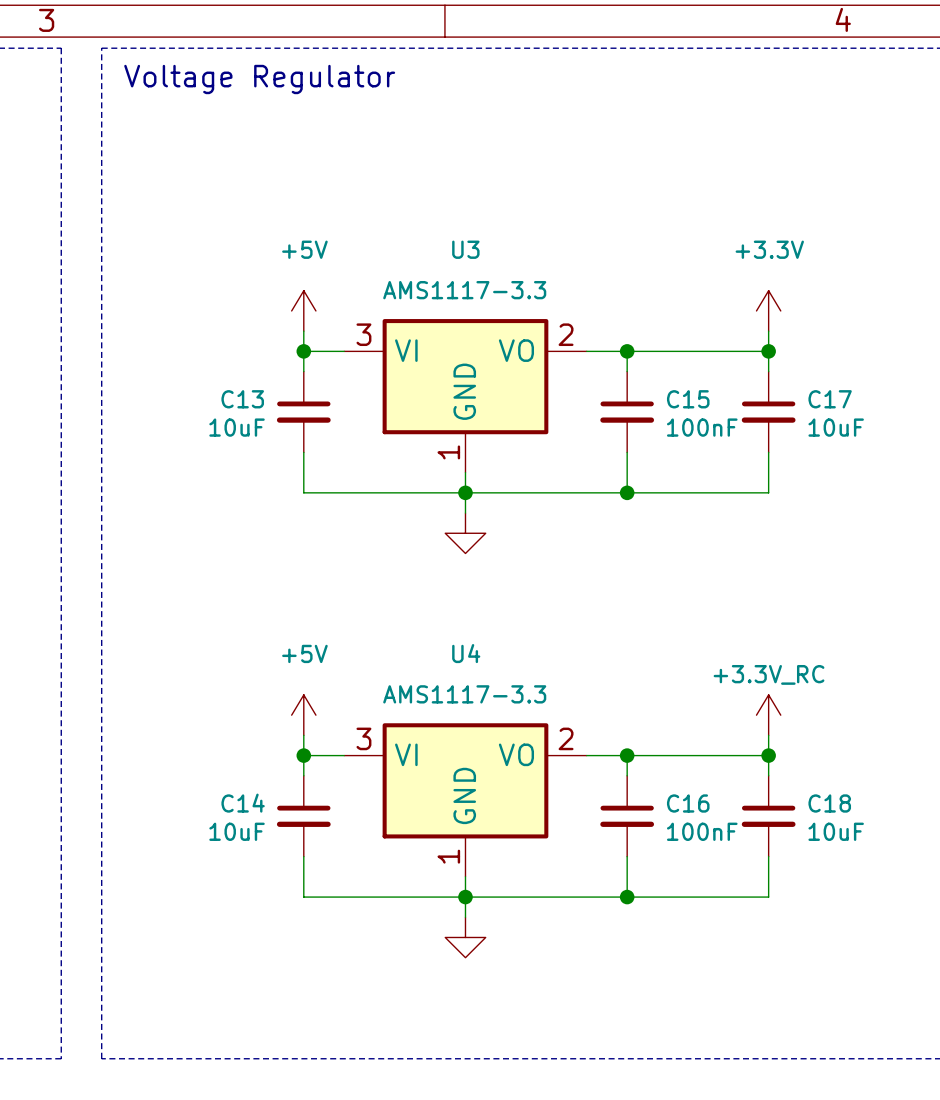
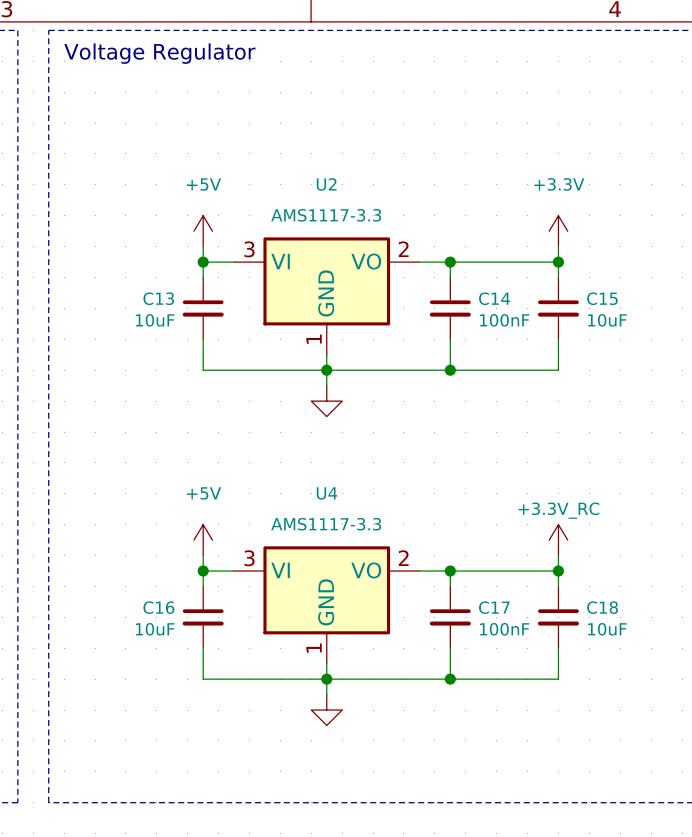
U3 name: U3 (465, 249) -> U2 (326, 184)
C15 name: C15 (688, 399) -> C14 (494, 298)
C17 name: C17 (830, 399) -> C15 (602, 298)
C14 name: C14 (243, 803) -> C16 (158, 607)
C16 name: C16 (688, 803) -> C17 (494, 607)

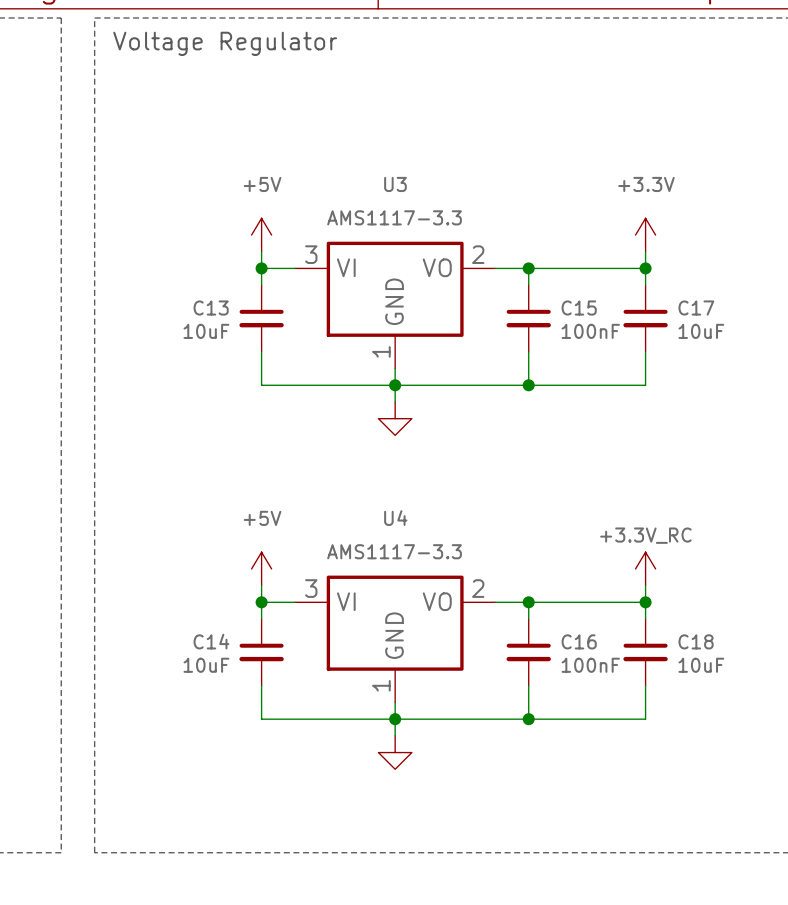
U2 name: U2 (326, 184) -> U3 (395, 184)
C14 name: C14 (494, 298) -> C15 (579, 308)
C15 name: C15 (602, 298) -> C17 (696, 308)
C16 name: C16 (158, 607) -> C14 (211, 641)
C17 name: C17 (494, 607) -> C16 (579, 641)

